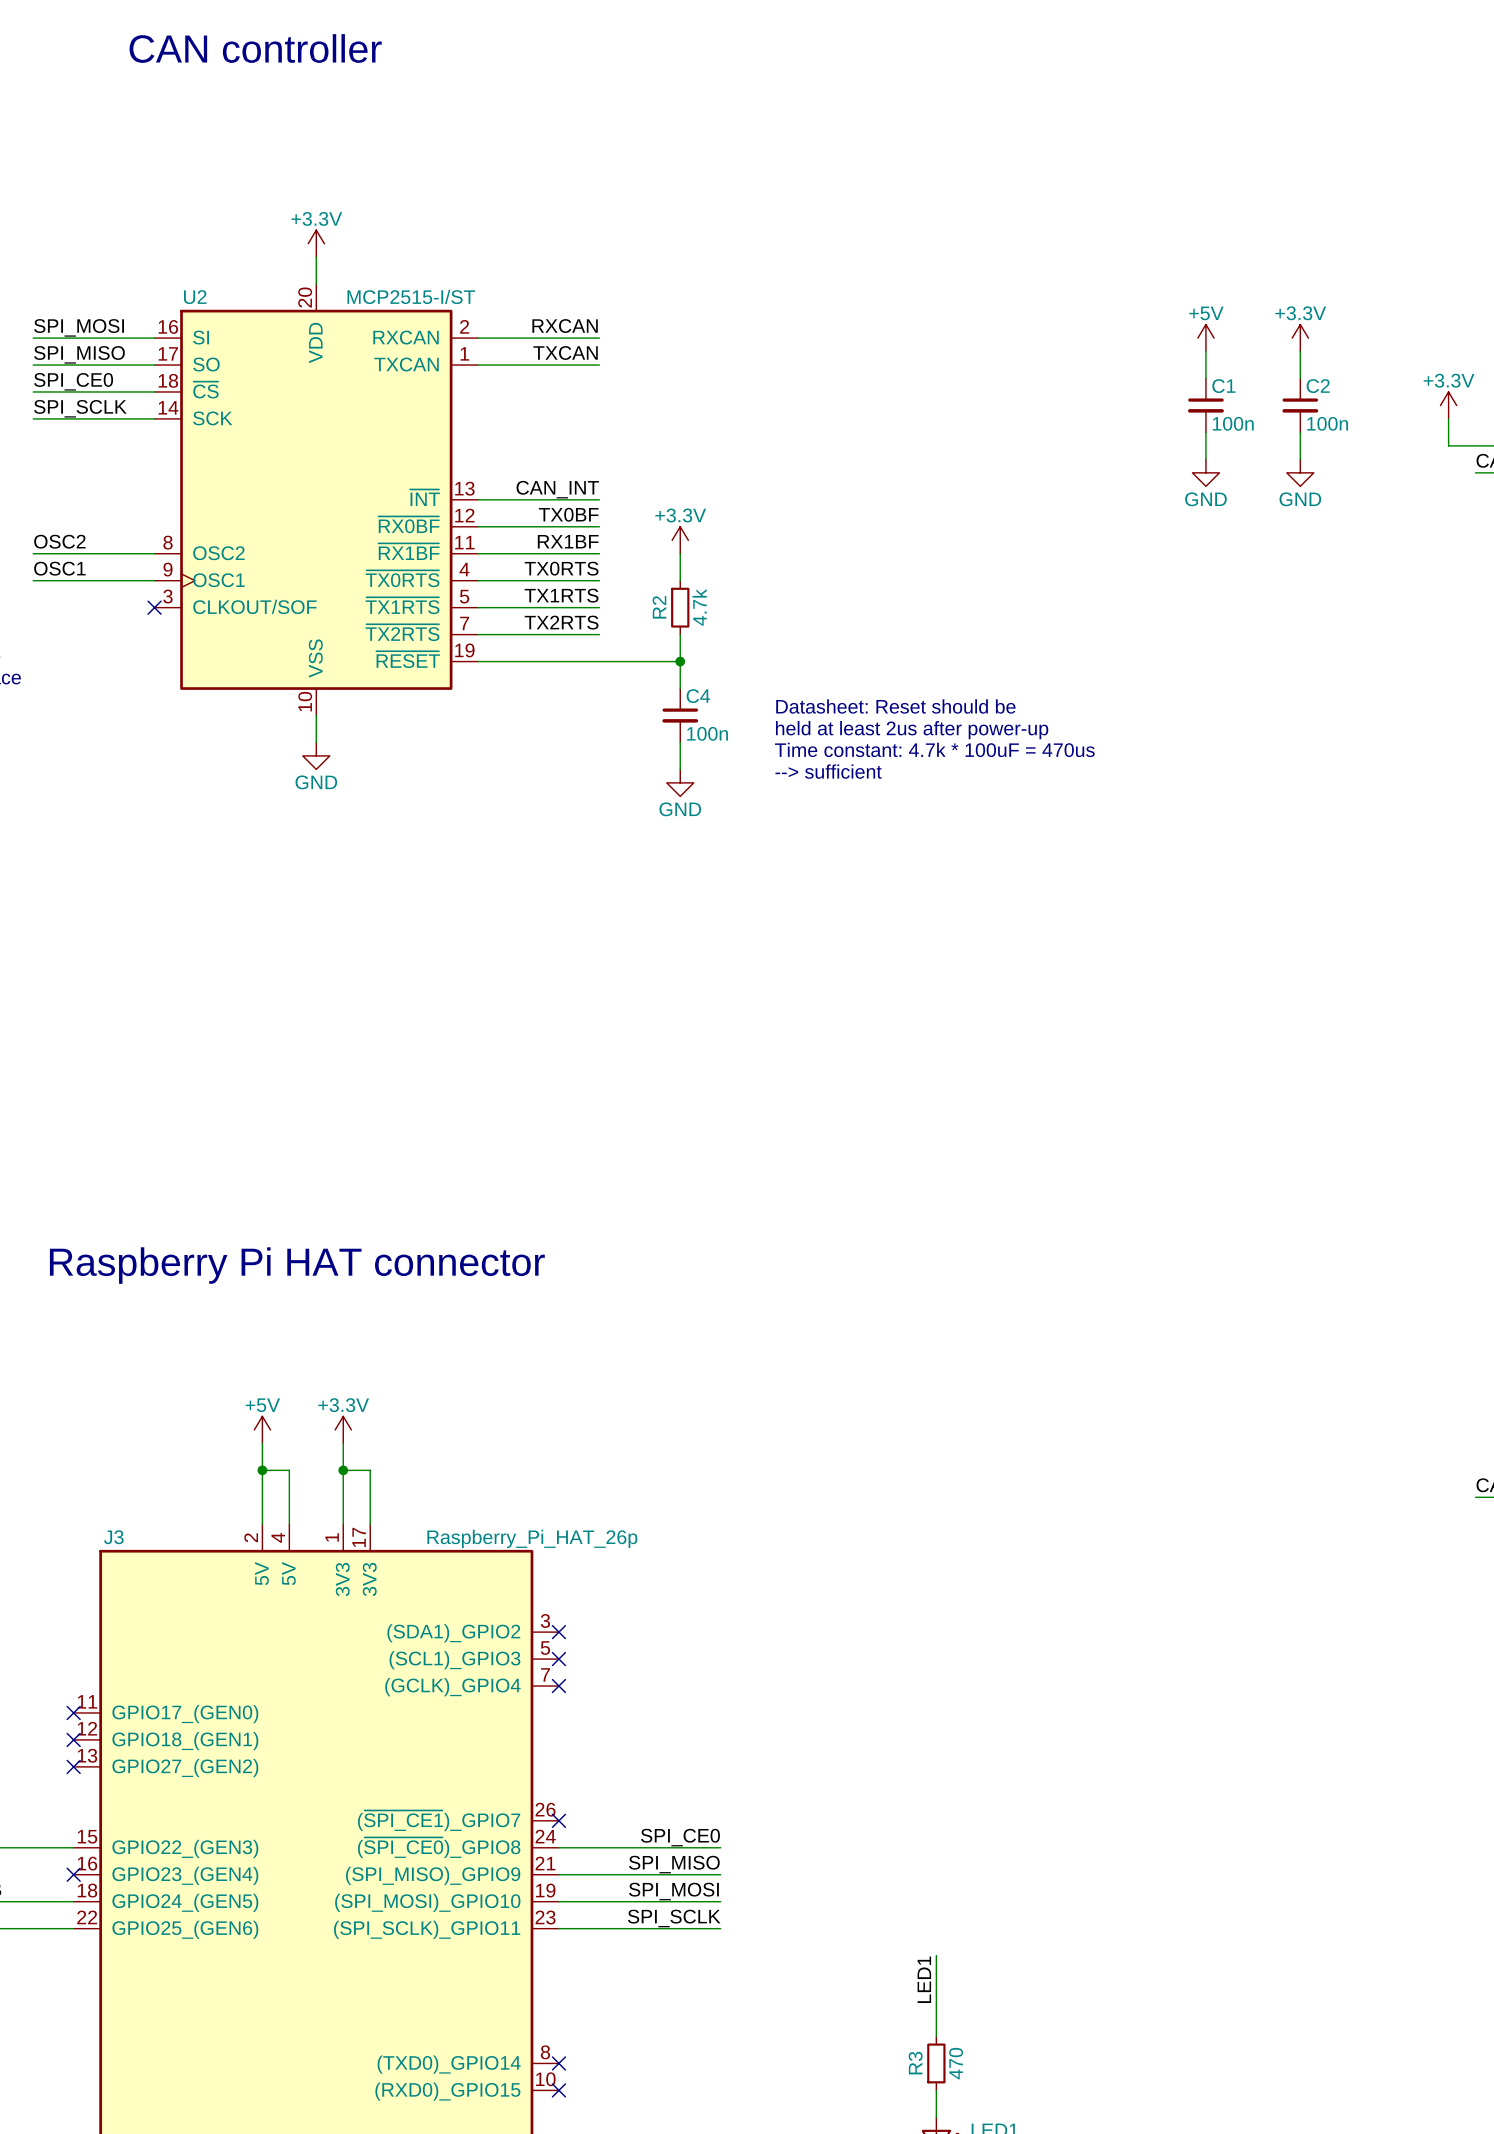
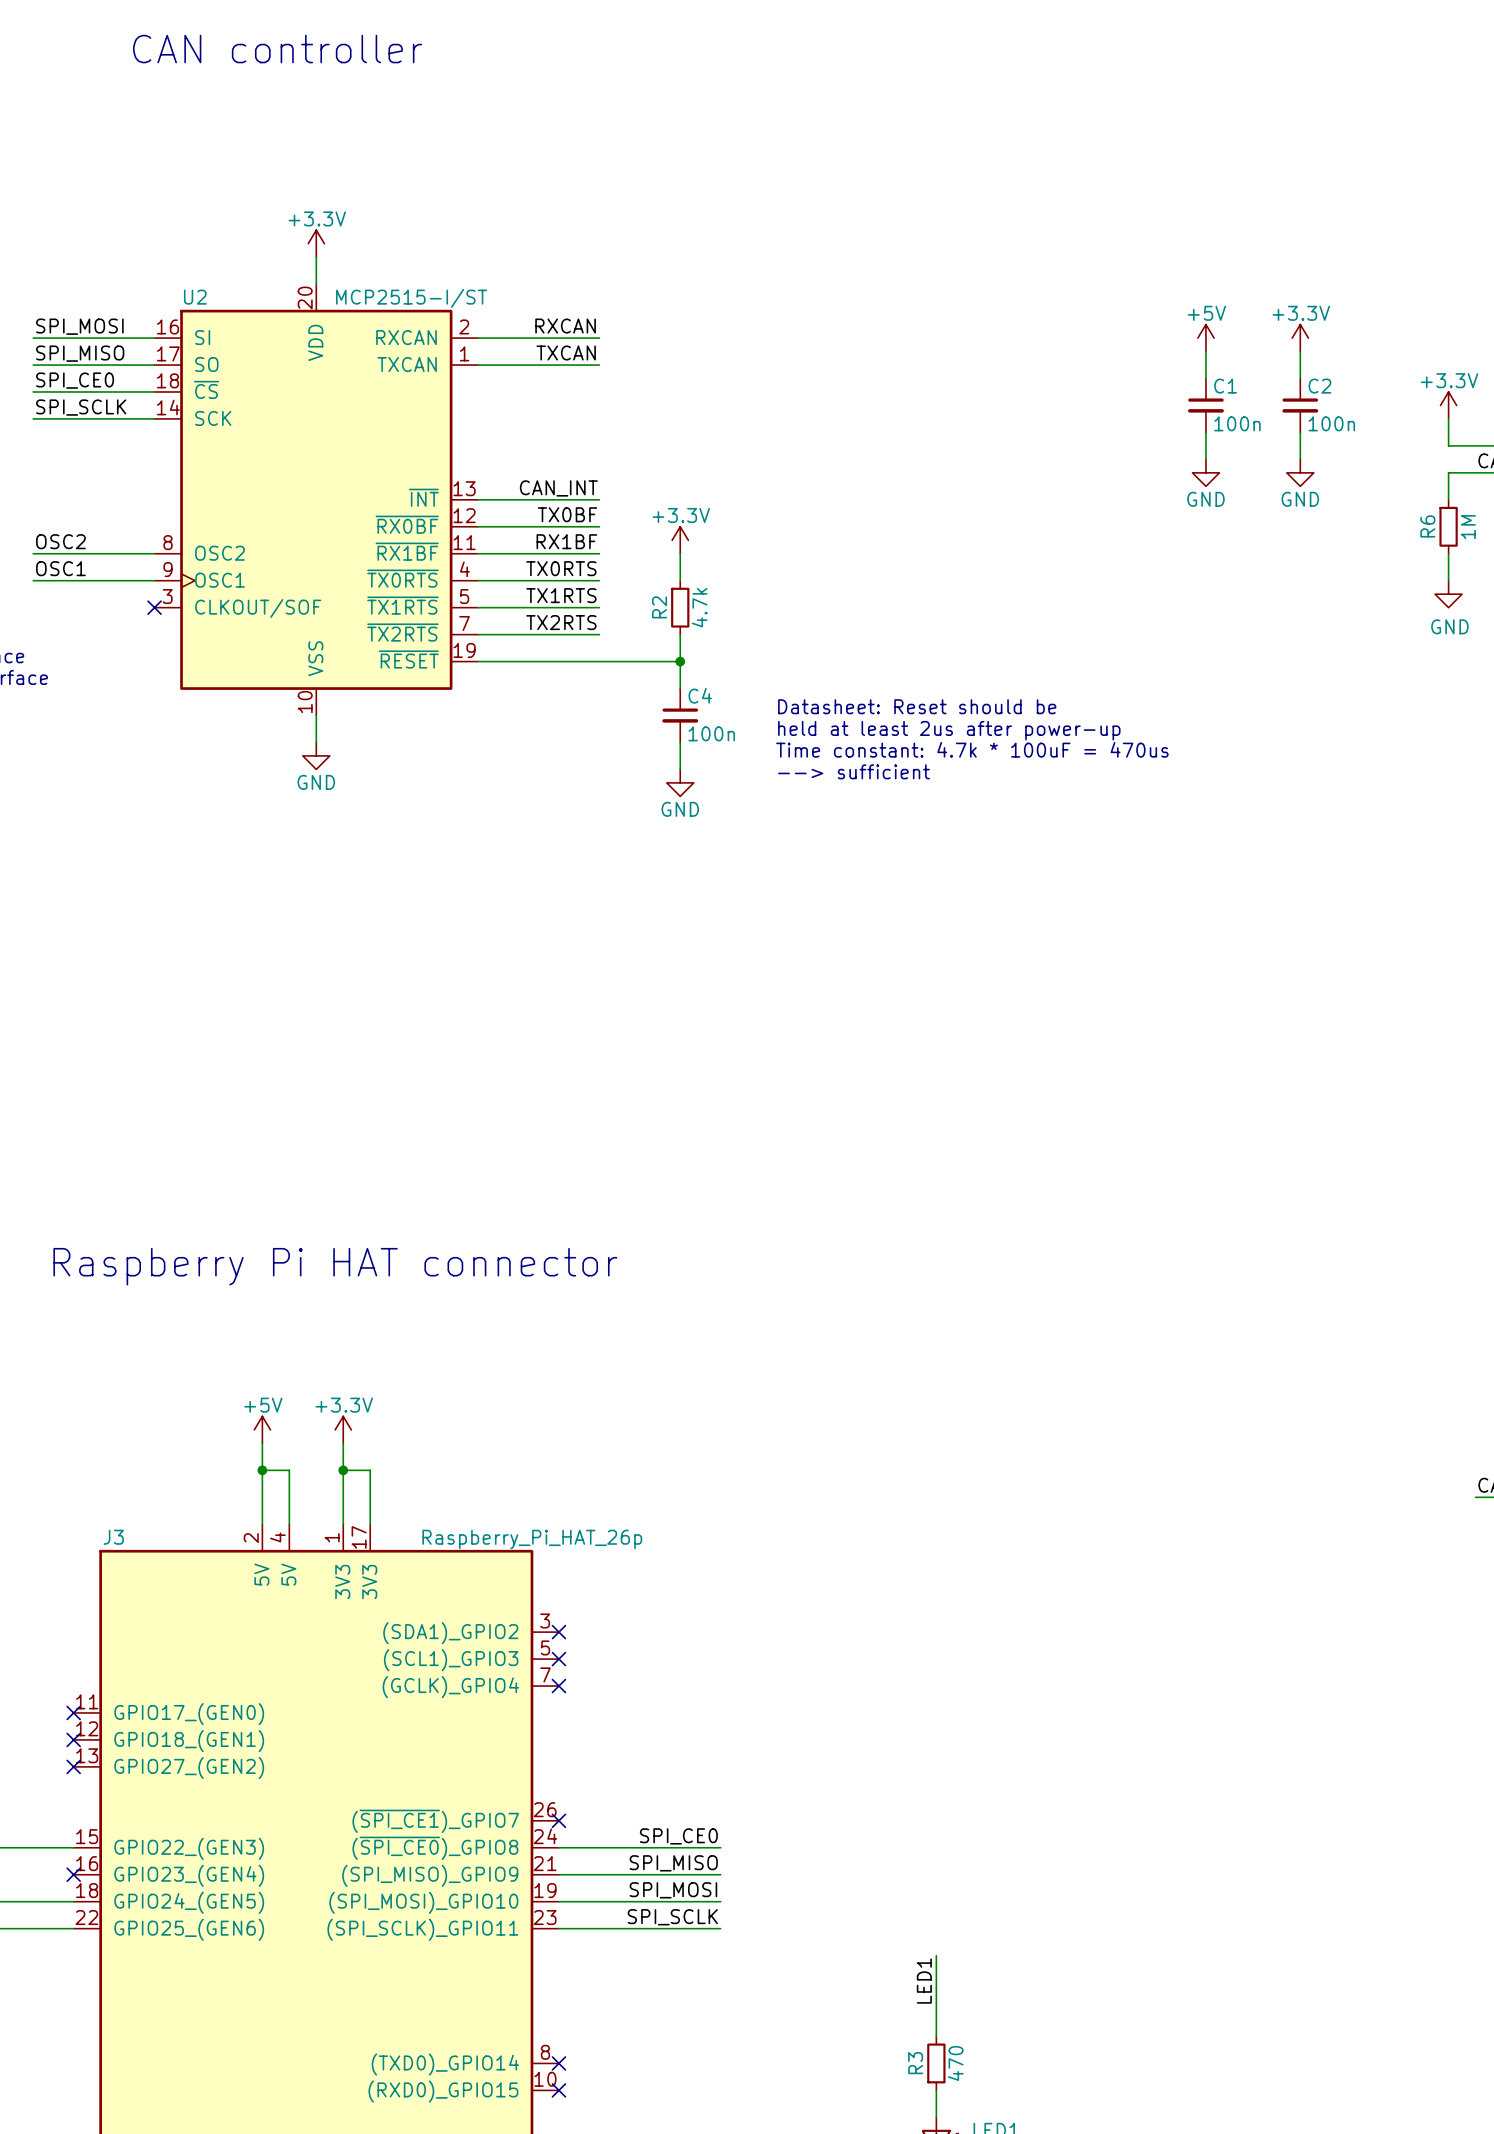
wire: none -> (1475, 472) (1448, 472) (1448, 499)
R6: none -> 1M (1448, 526)
wire: none -> (1448, 553) (1448, 580)
power symbol: none -> GND (1448, 594)

